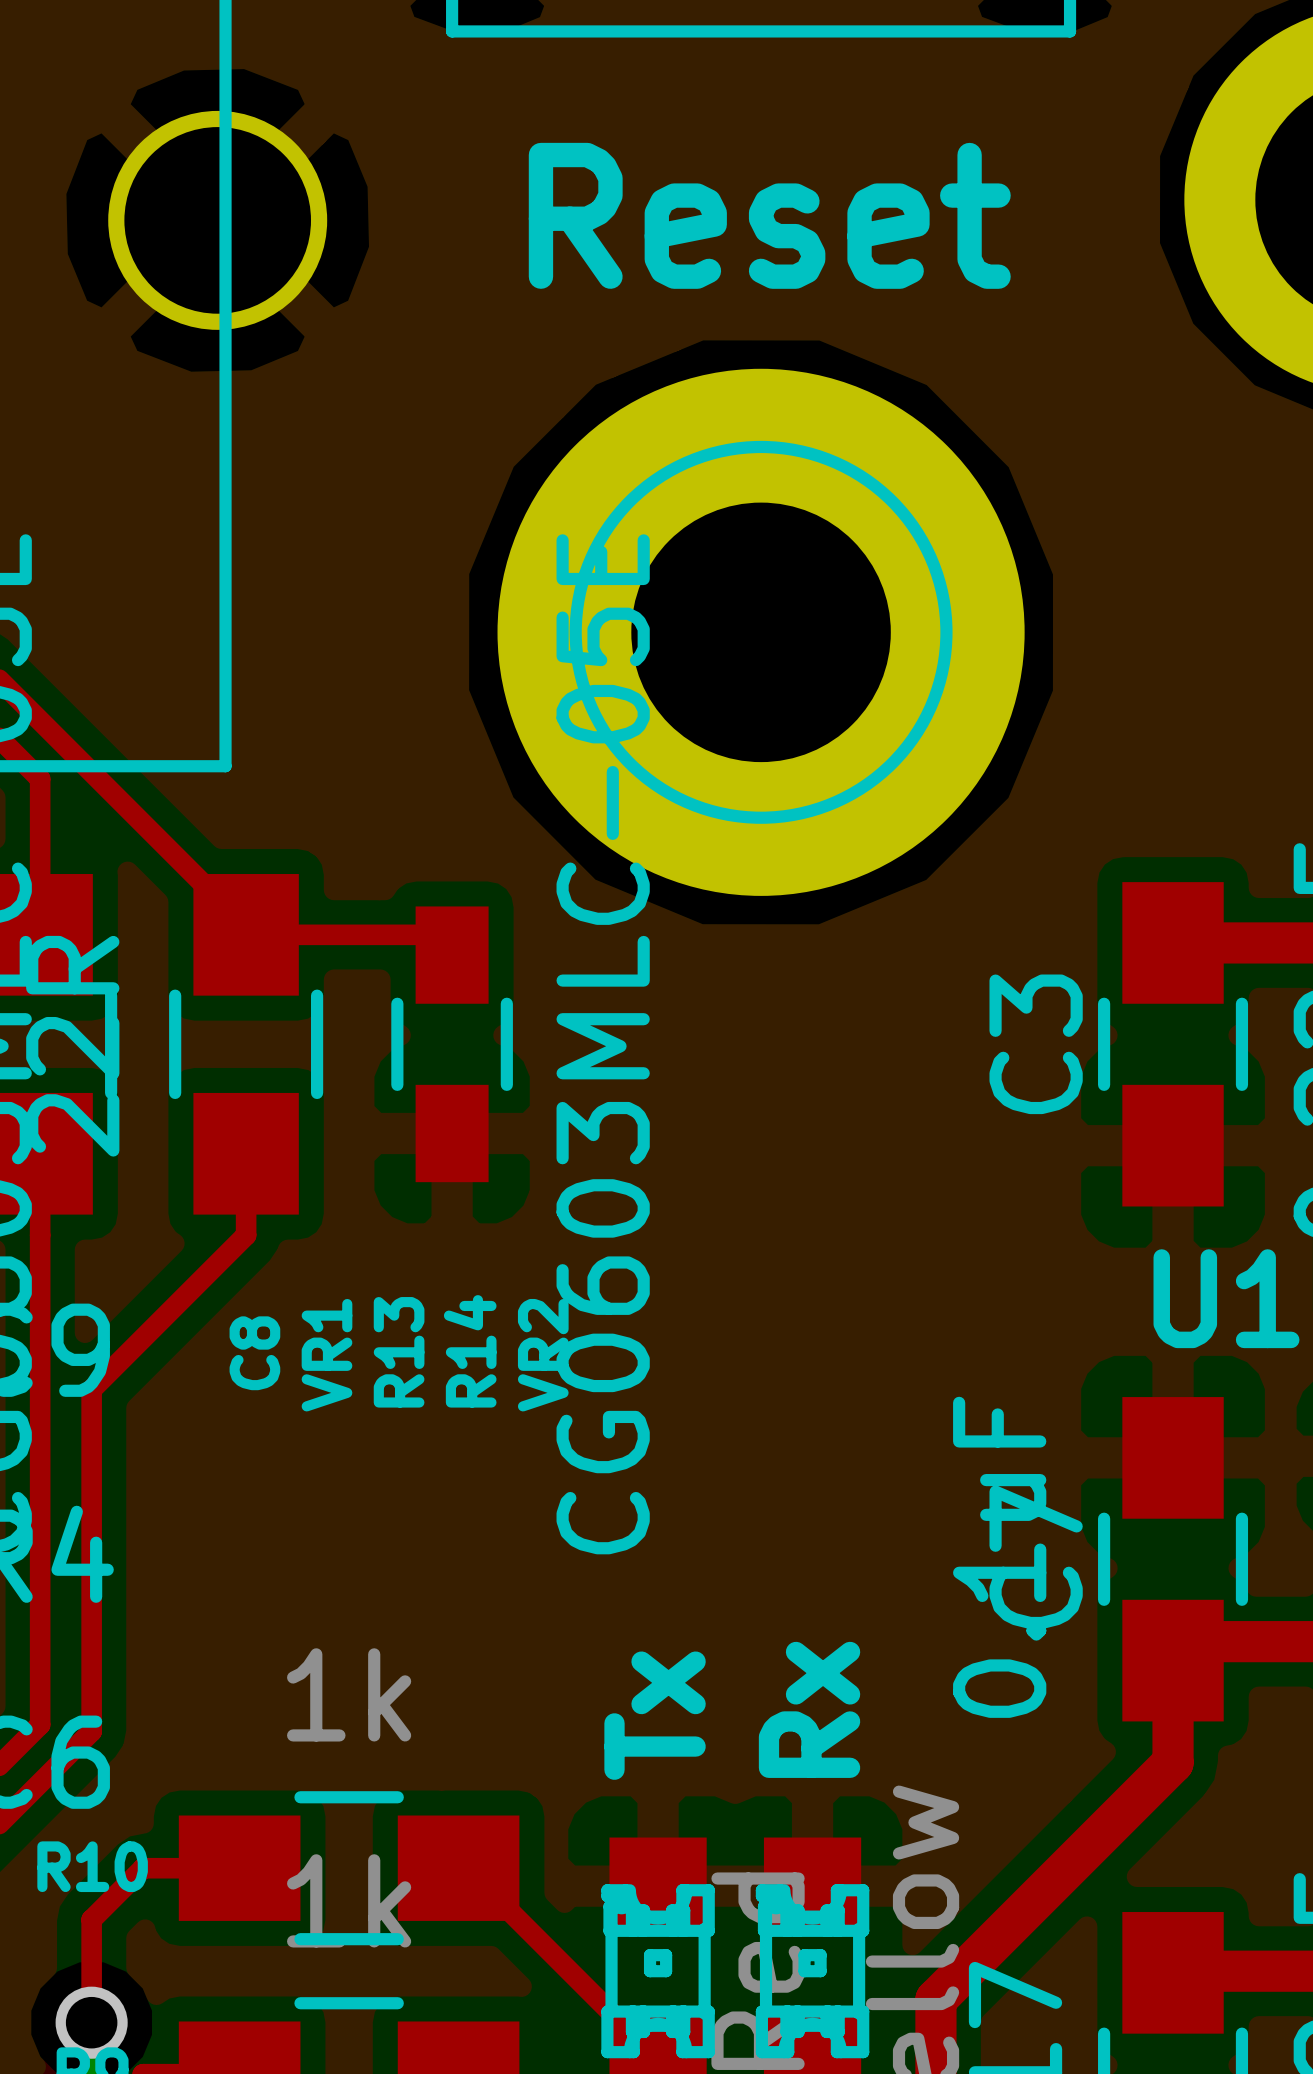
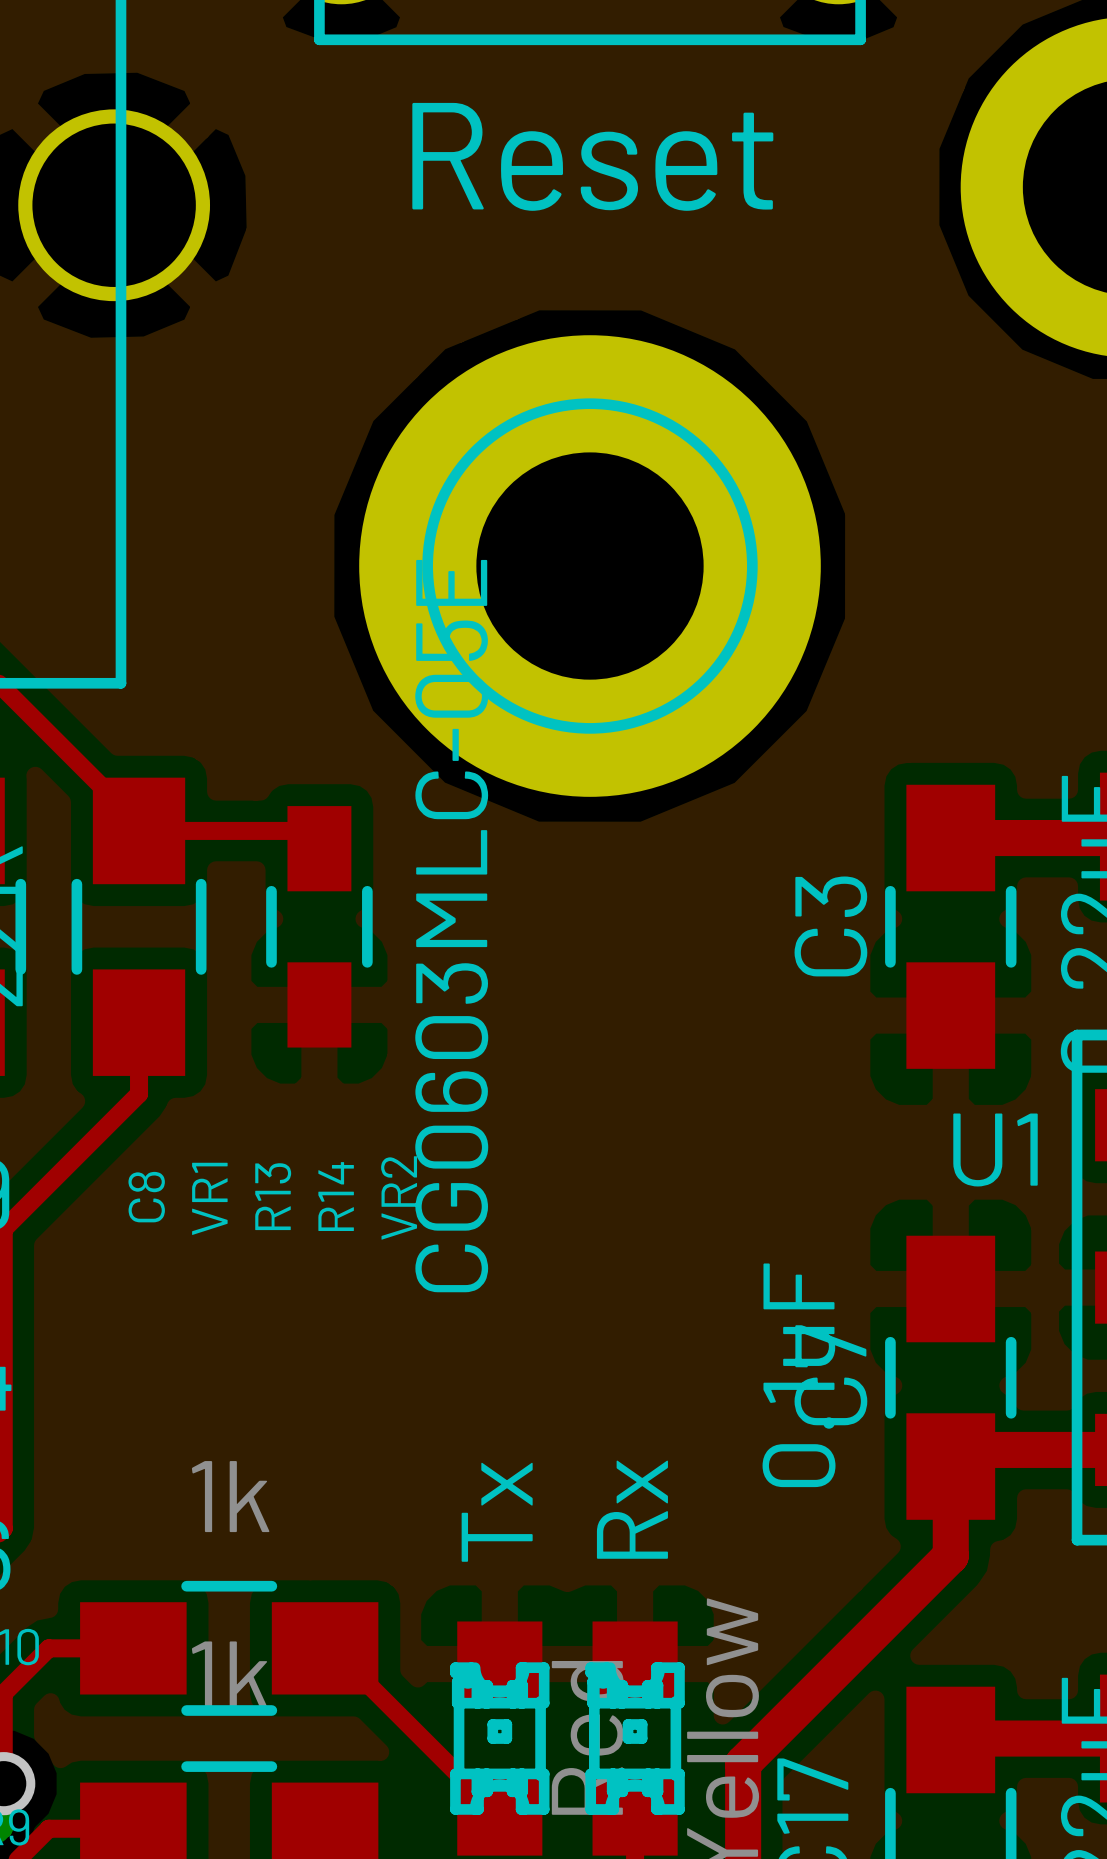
text position: Reset (769, 215) -> Reset (592, 156)

